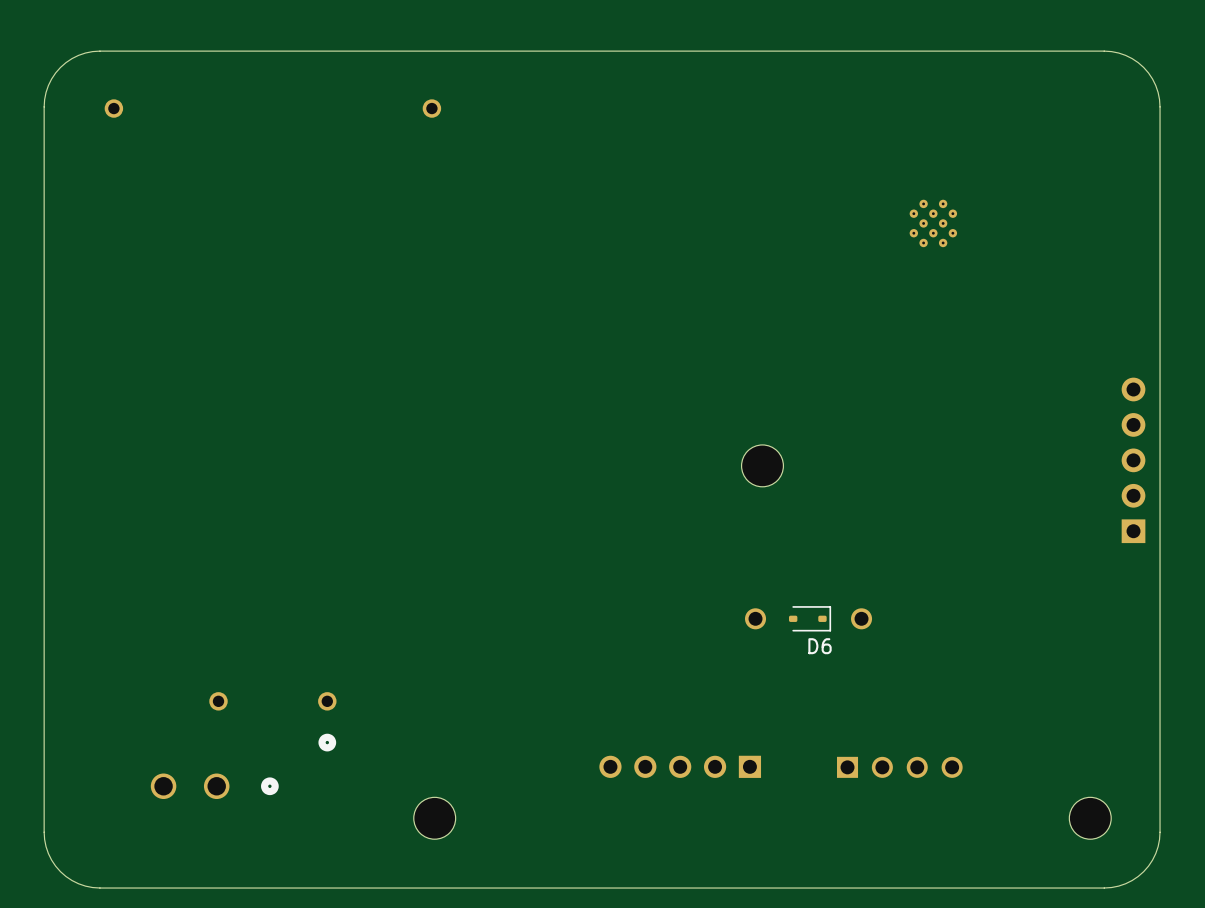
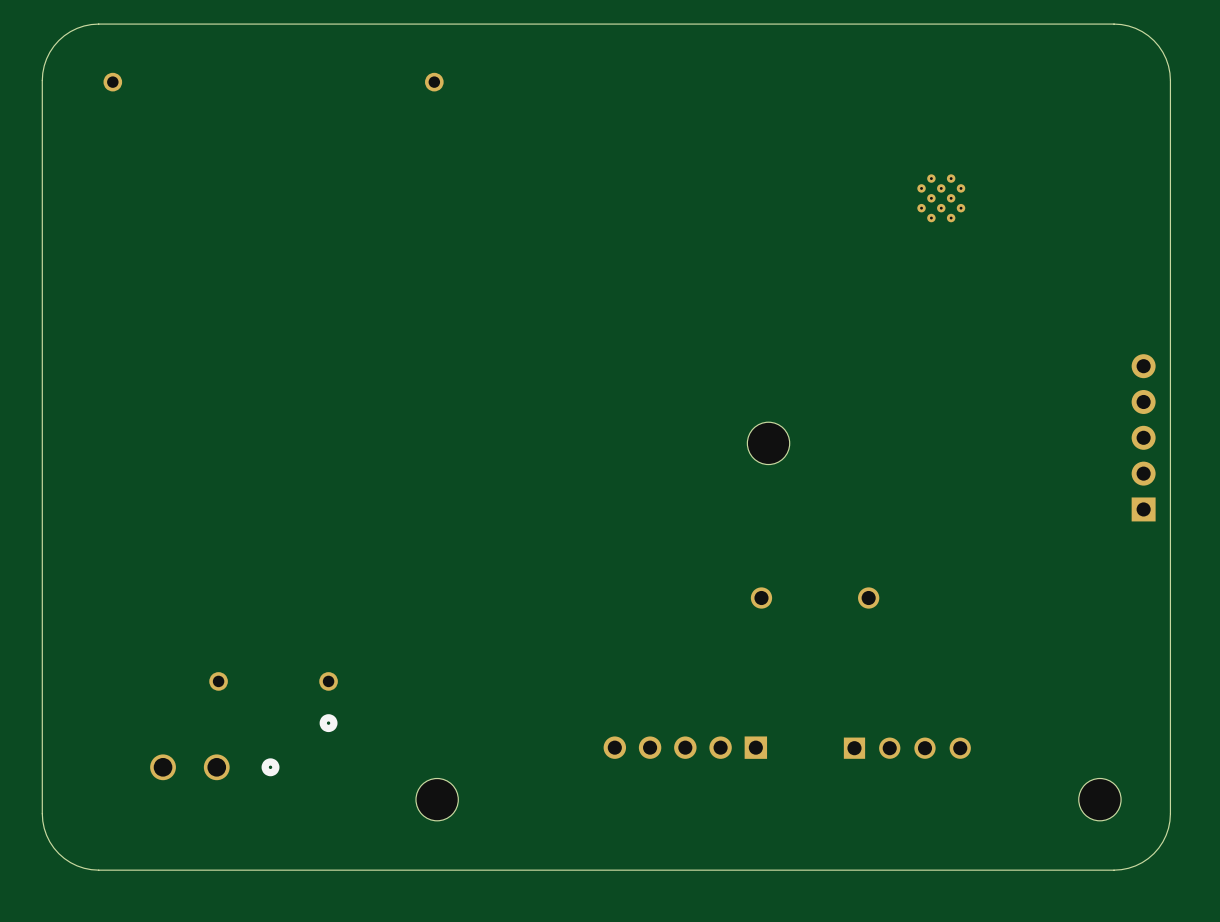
D6: (810, 618) -> none

